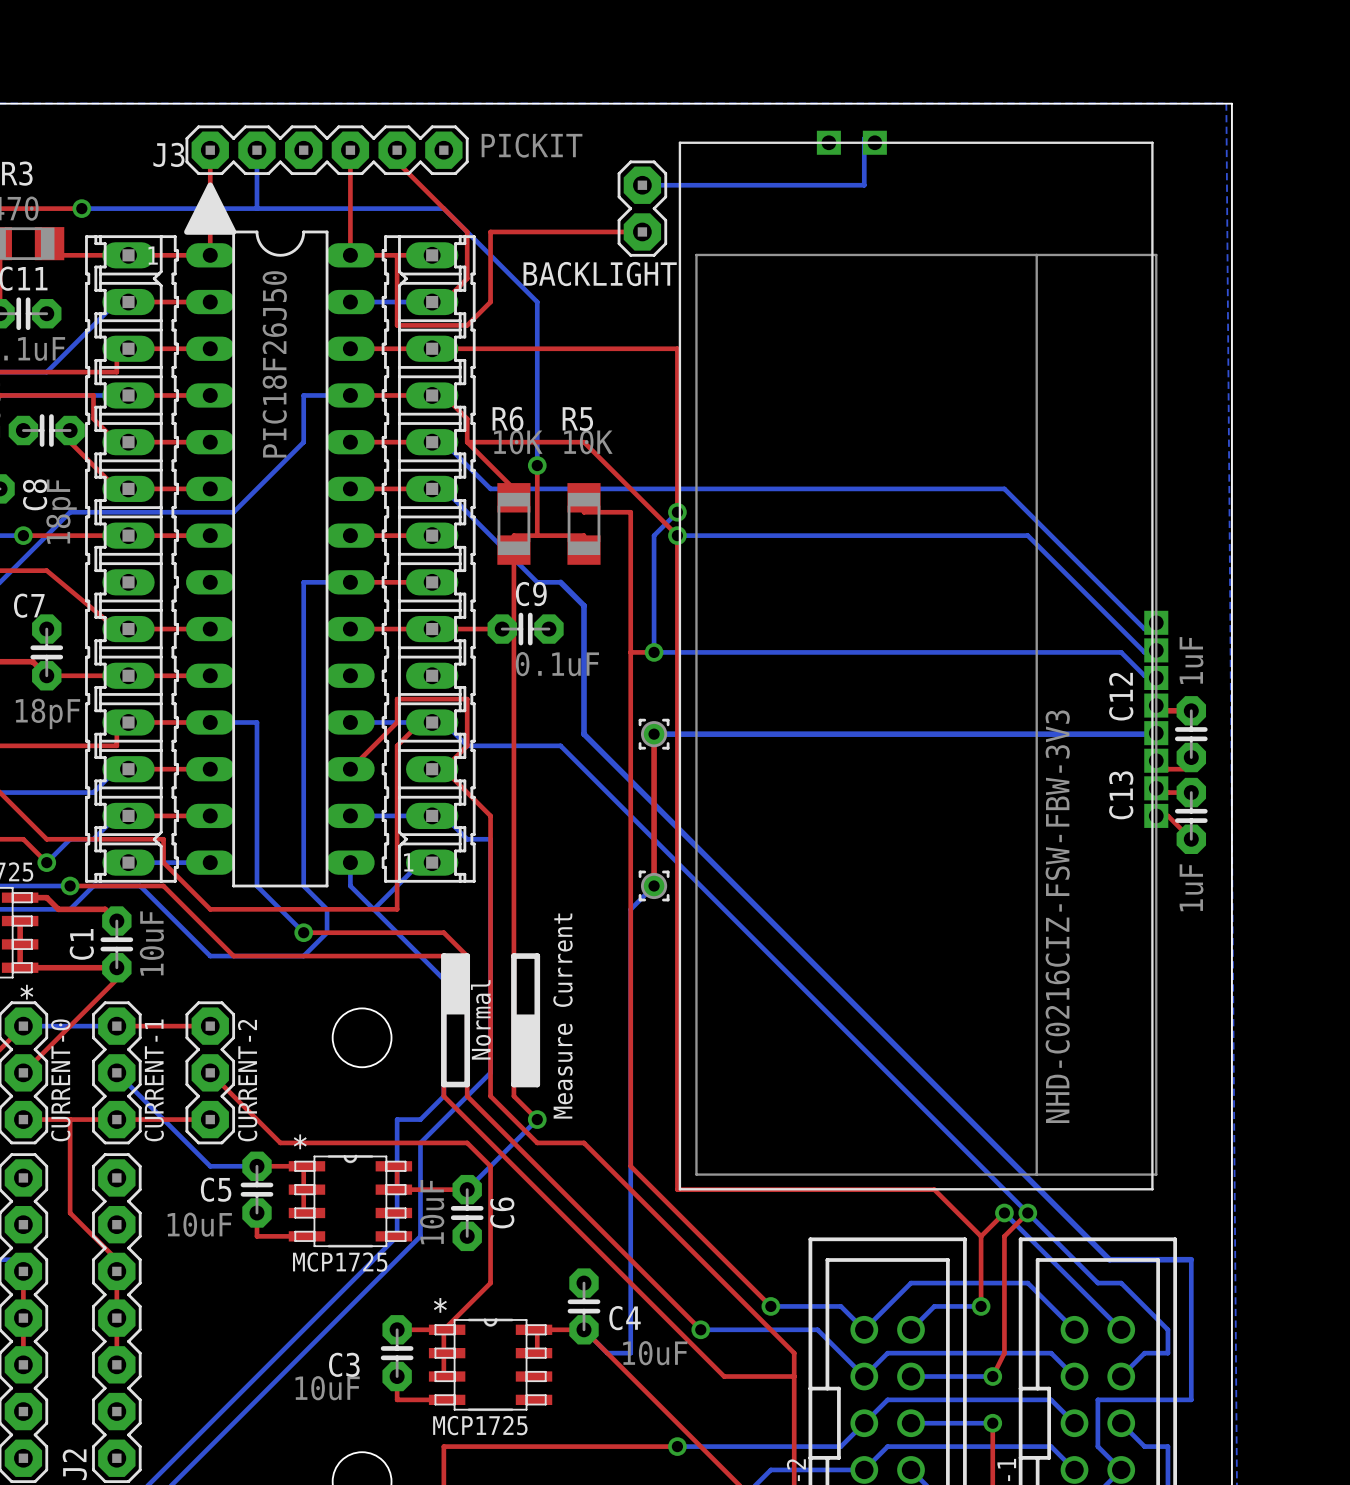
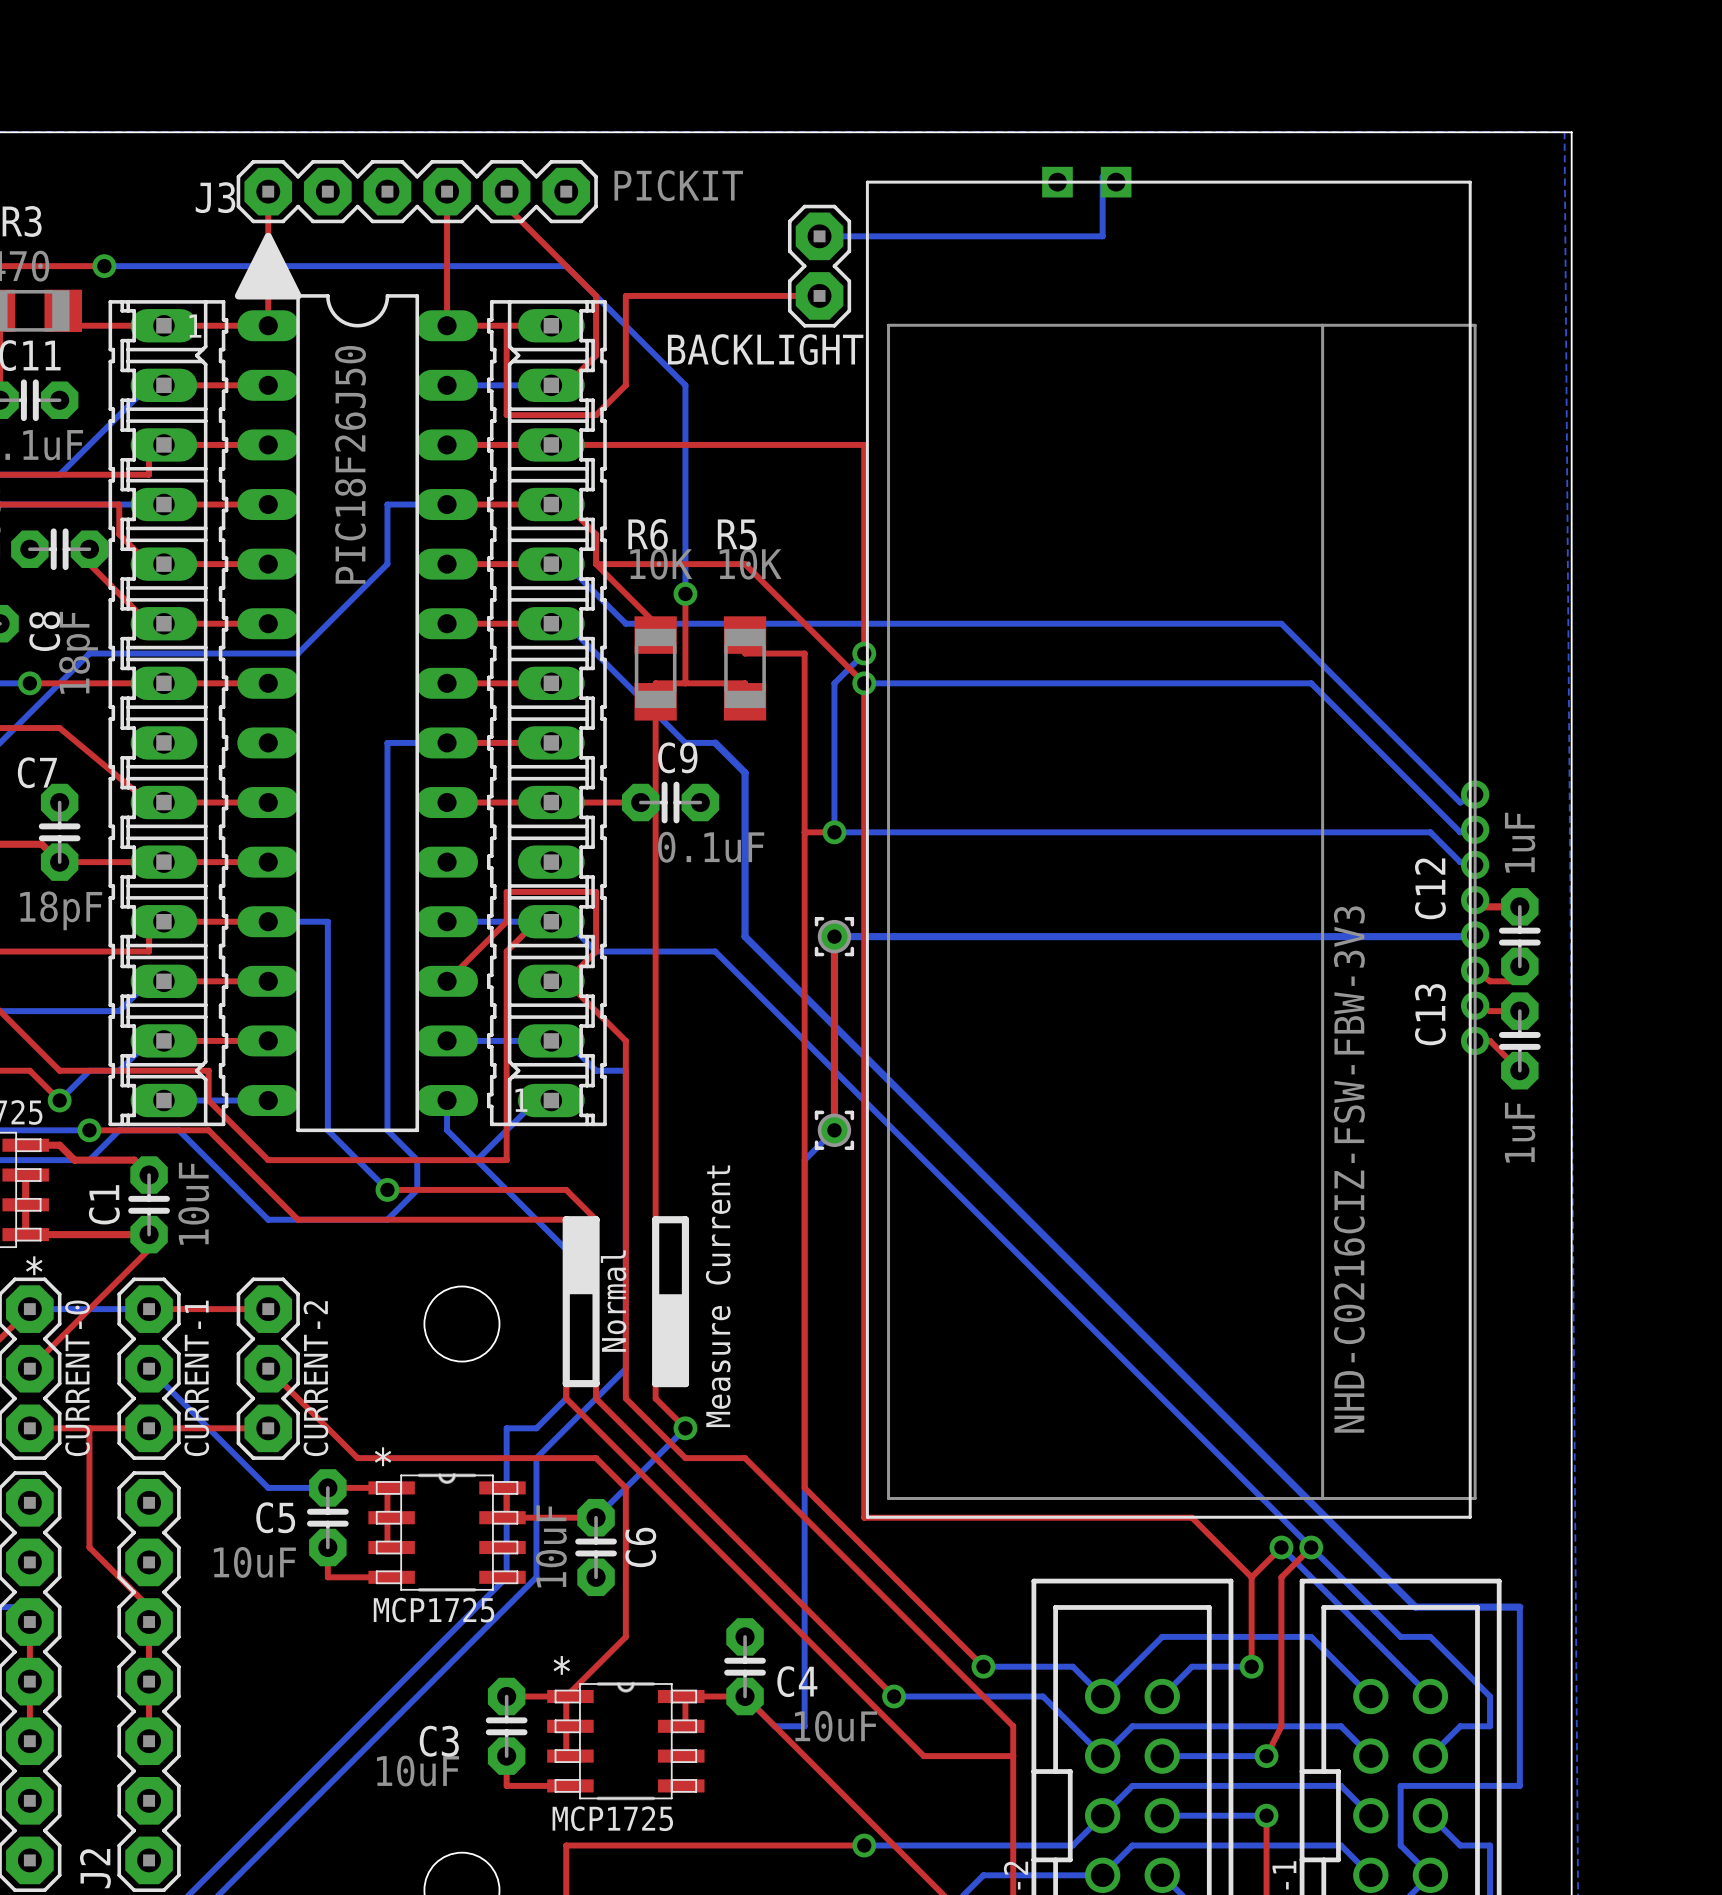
part footprint: [678, 130, 1169, 1191] -> [865, 166, 1490, 1519]
bottom track: (256, 150) (256, 208) -> none

